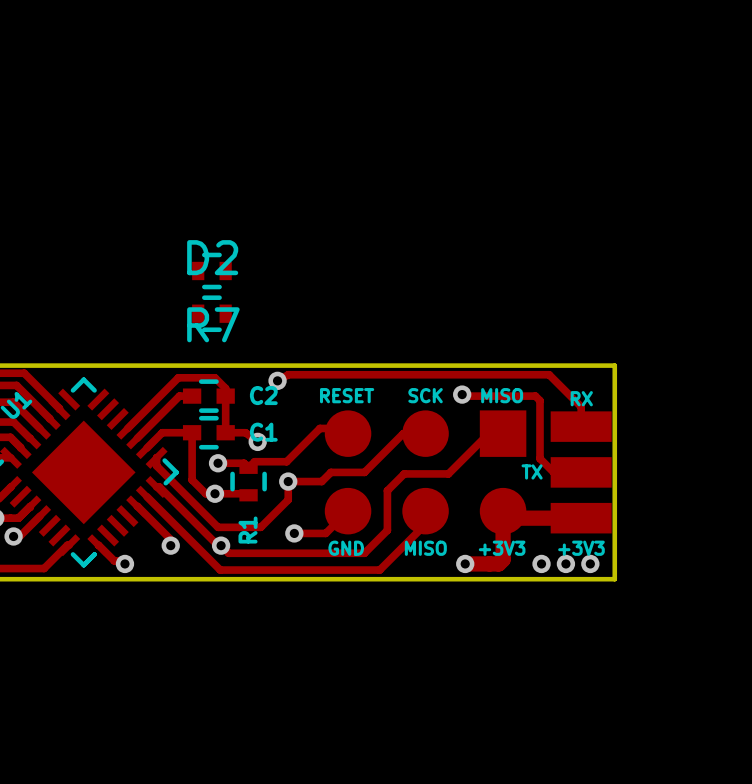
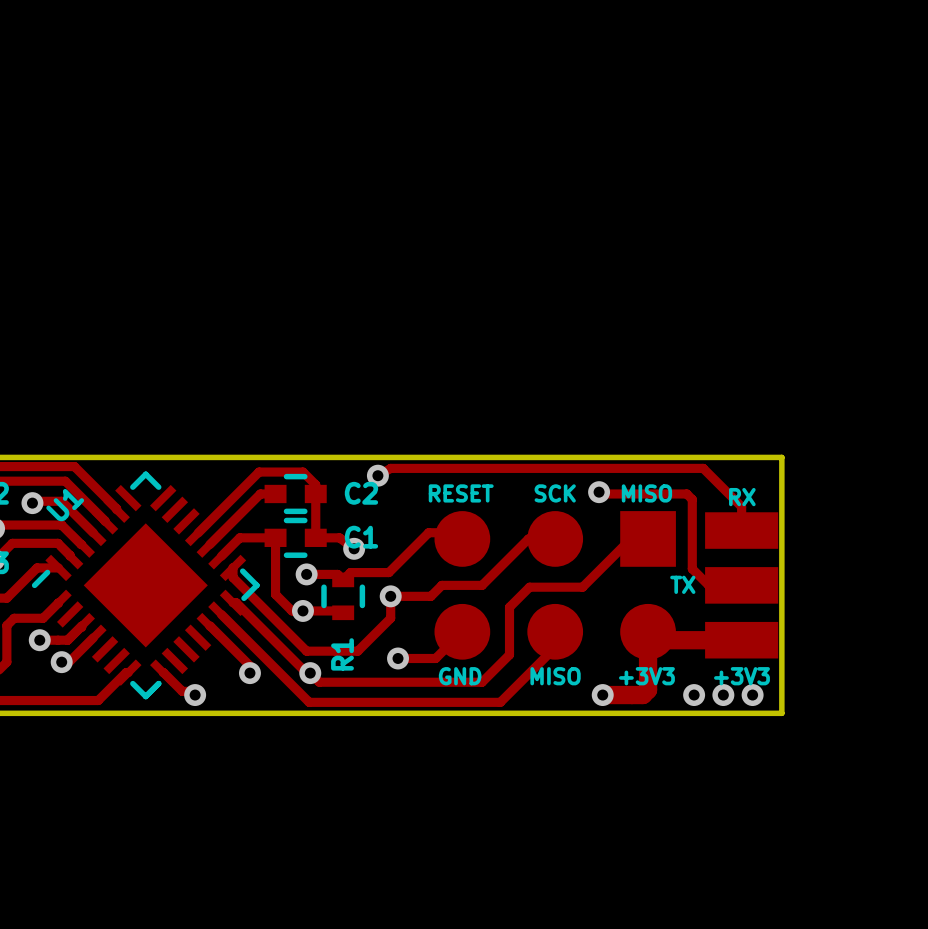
R7: (211, 270) -> none
D2: (211, 313) -> none

